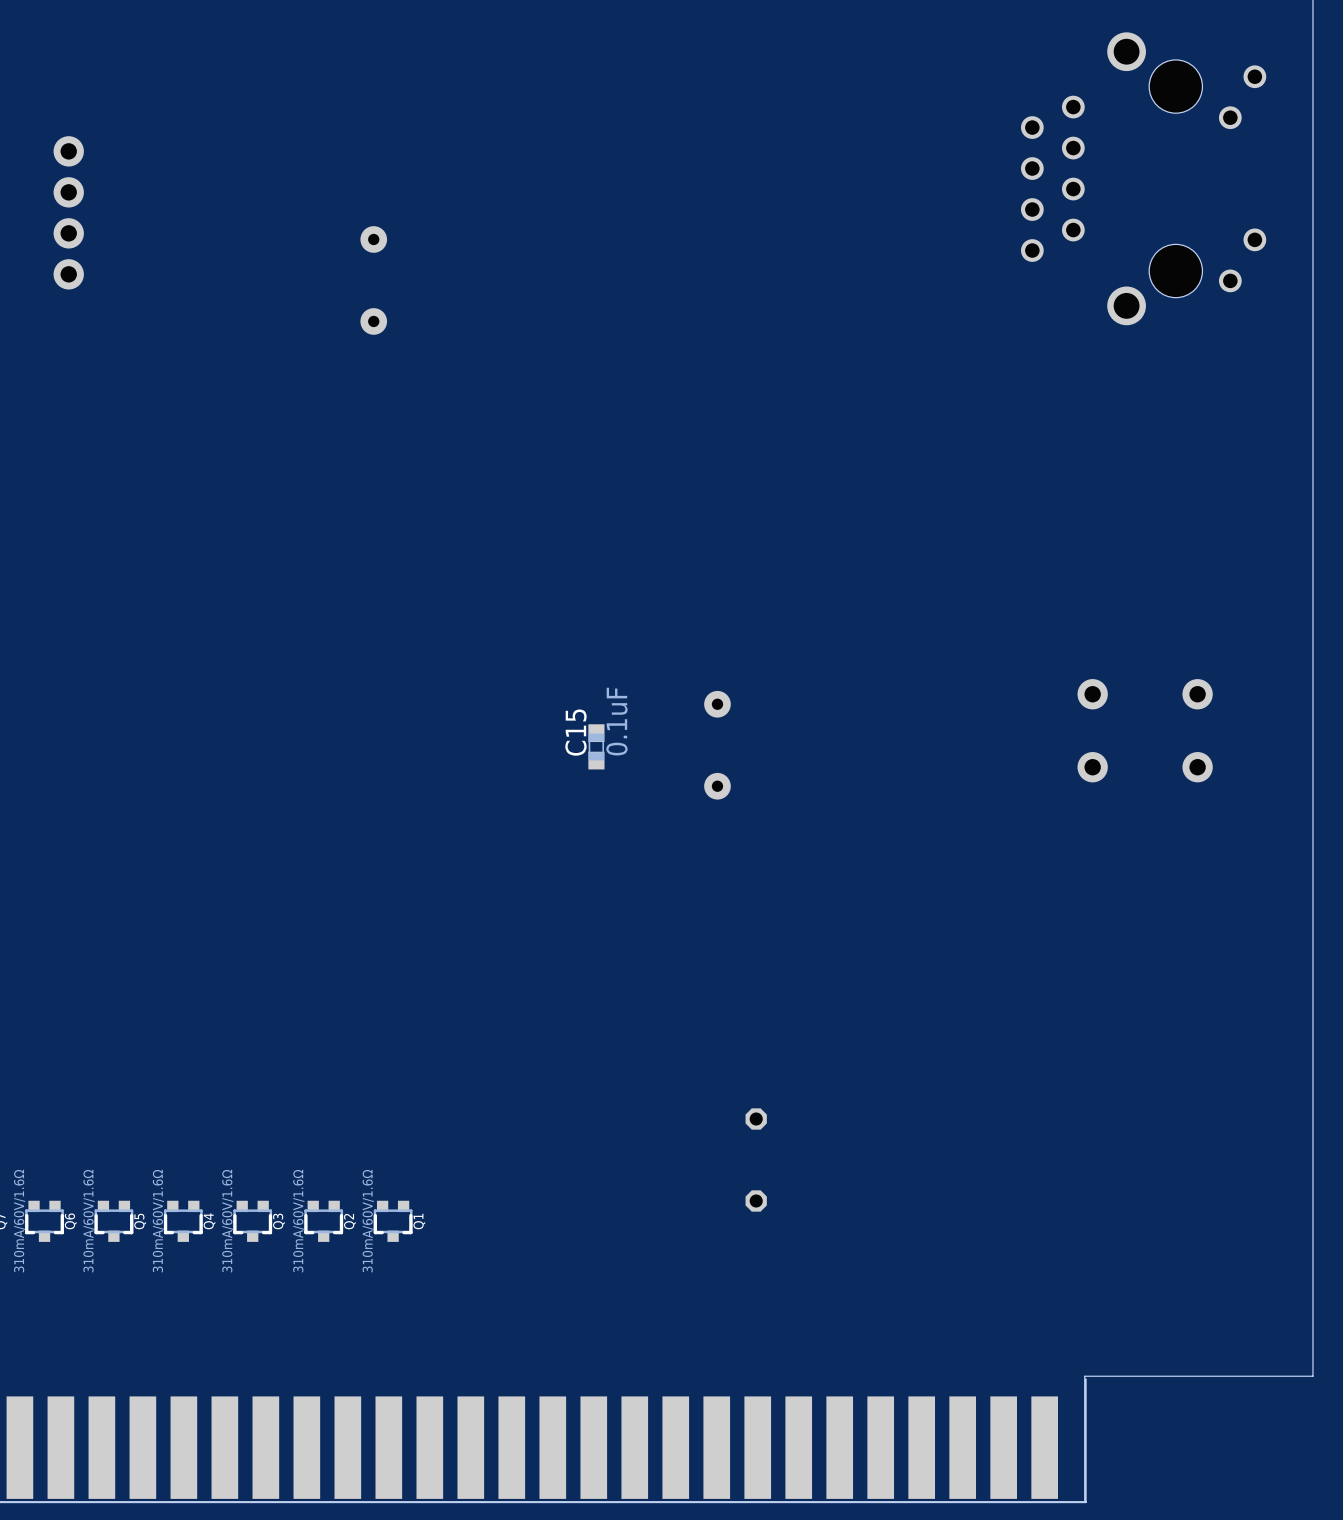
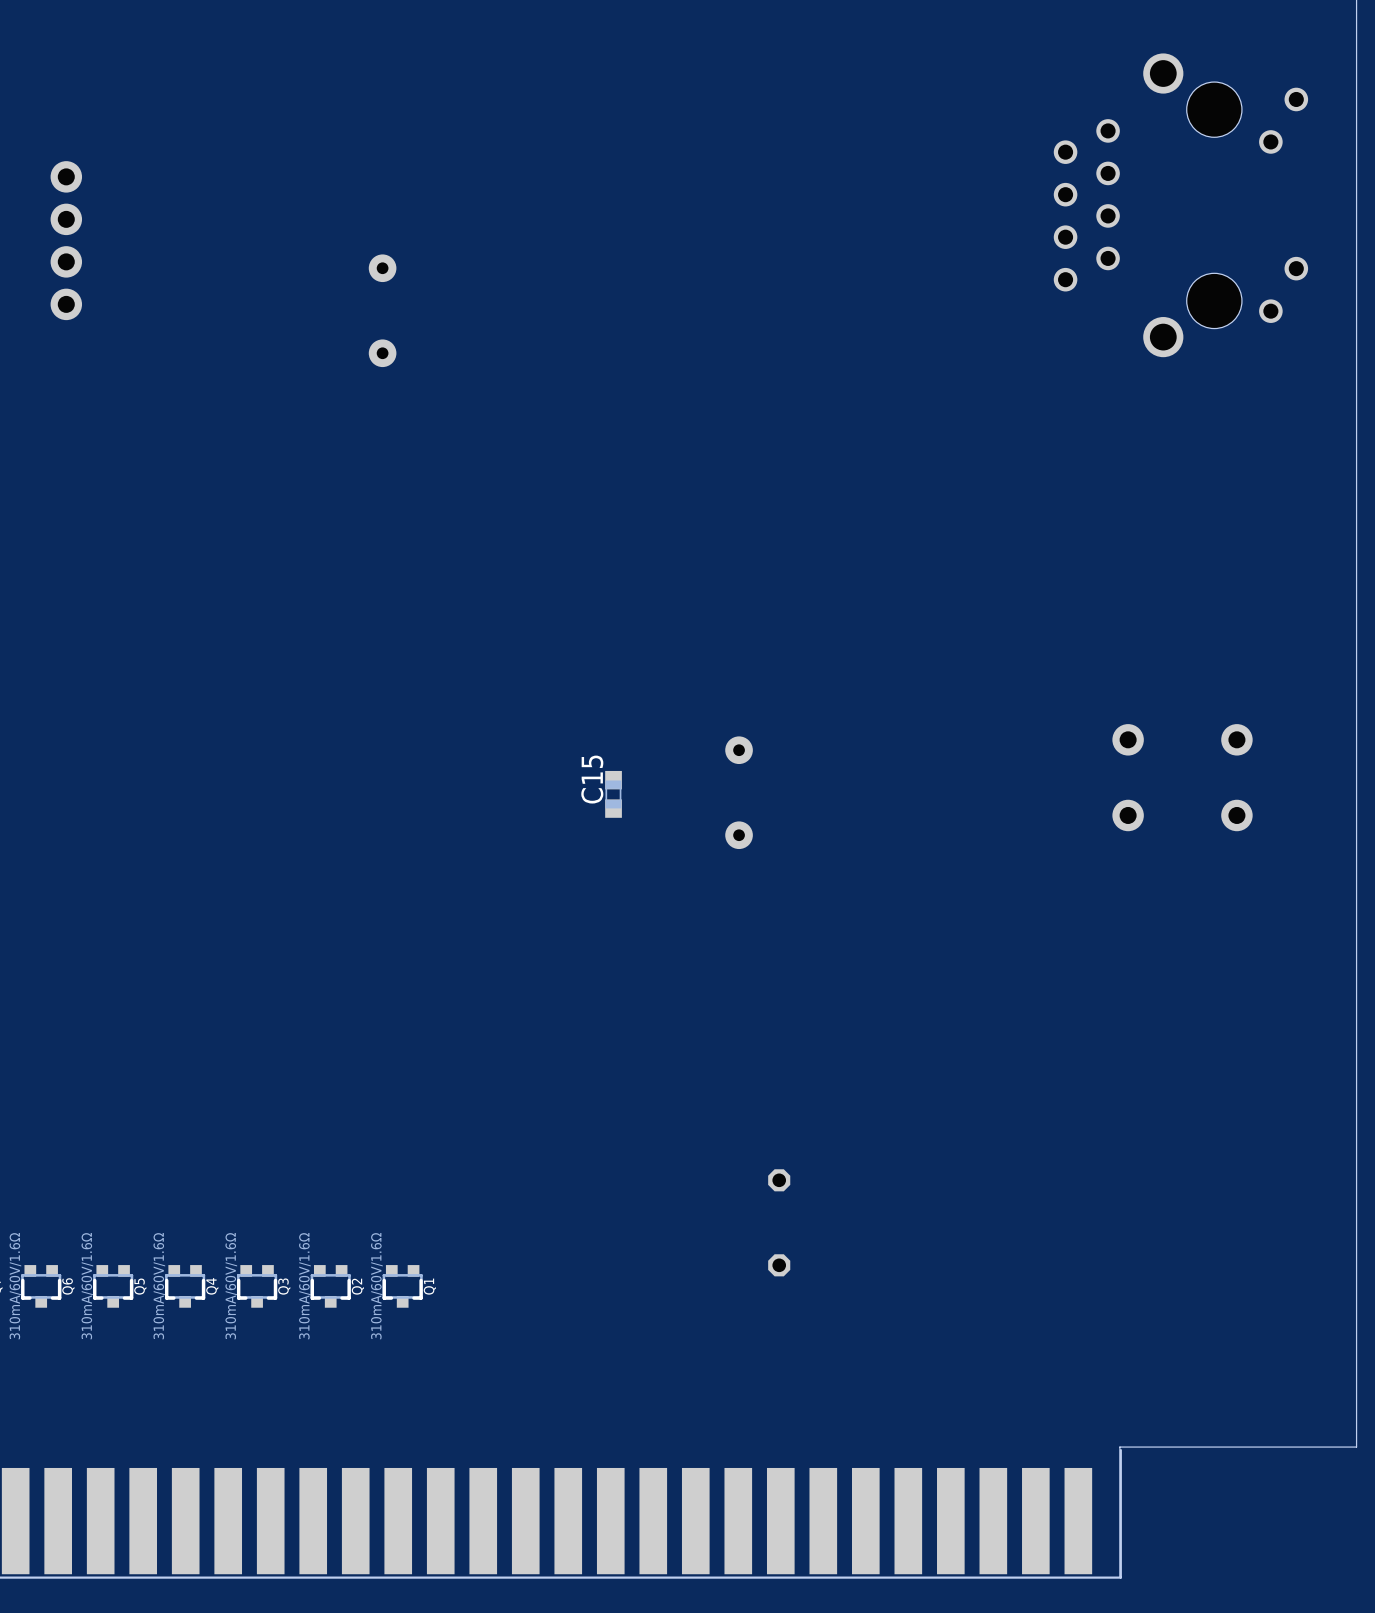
C15 value: 0.1uF (616, 721) -> none

